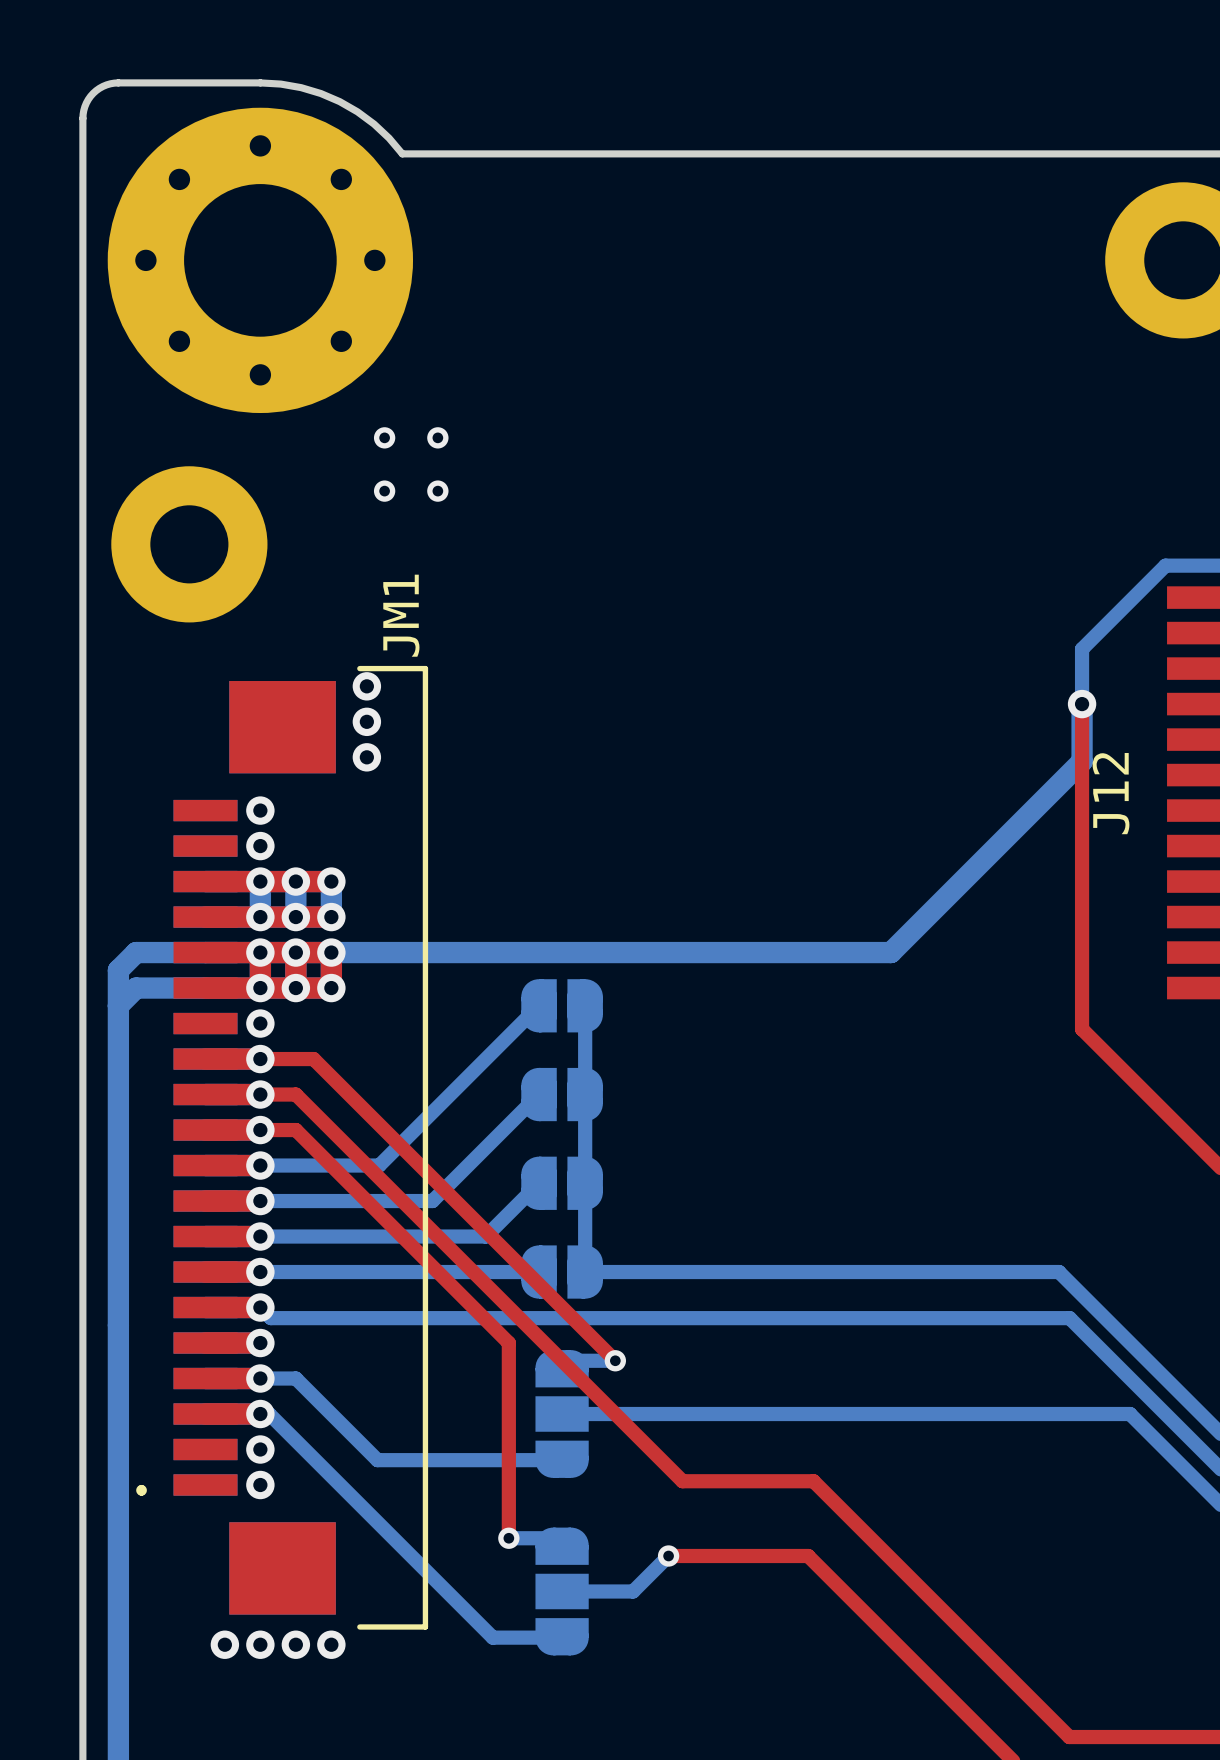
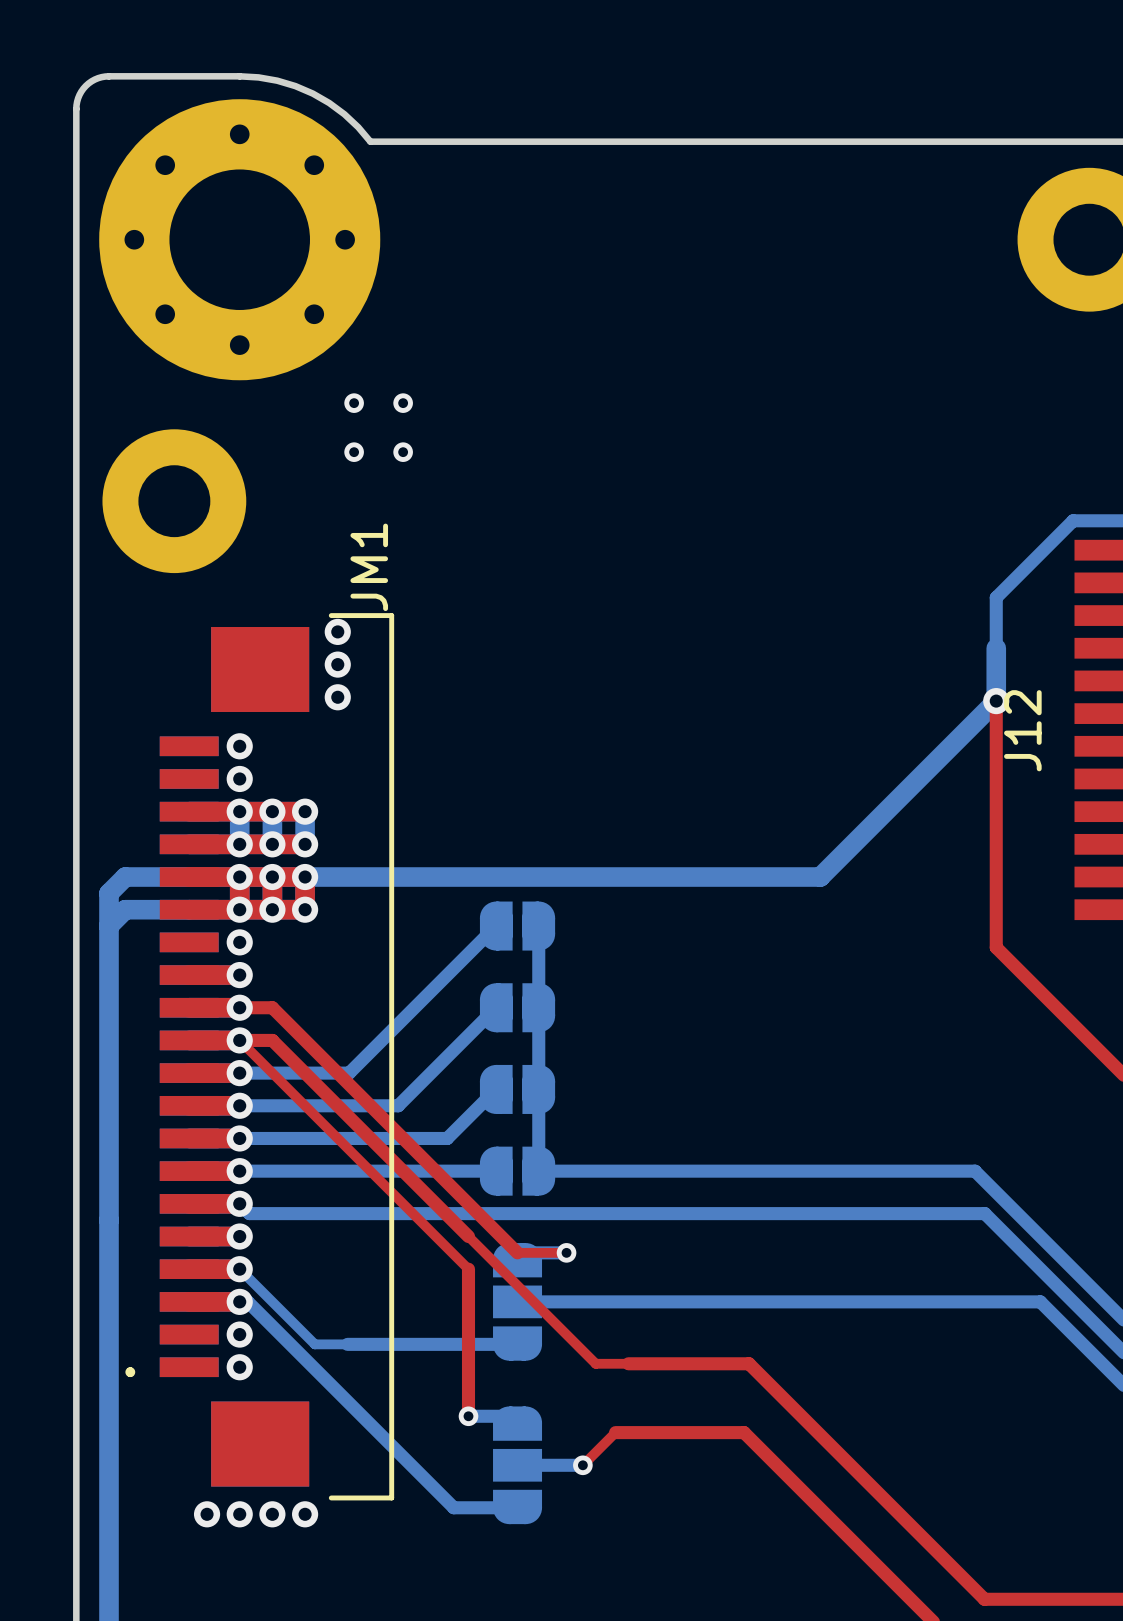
top track: (1082, 704) (1082, 761) -> none
via position: (1082, 704) -> (996, 701)
top track: (260, 1059) (313, 1059) (615, 1360) -> (517, 1252) (566, 1252)
top track: (508, 1343) (508, 1378) -> (239, 1040) (468, 1269)
top track: (562, 1360) (682, 1481) -> (468, 1236) (595, 1363) (628, 1363)
bottom track: (260, 1378) (295, 1378) (377, 1460) -> (239, 1269) (314, 1344) (347, 1344)
top track: none -> (615, 1432) (582, 1465)
bottom track: (668, 1556) (633, 1591) -> none
via position: (668, 1556) -> (582, 1465)

